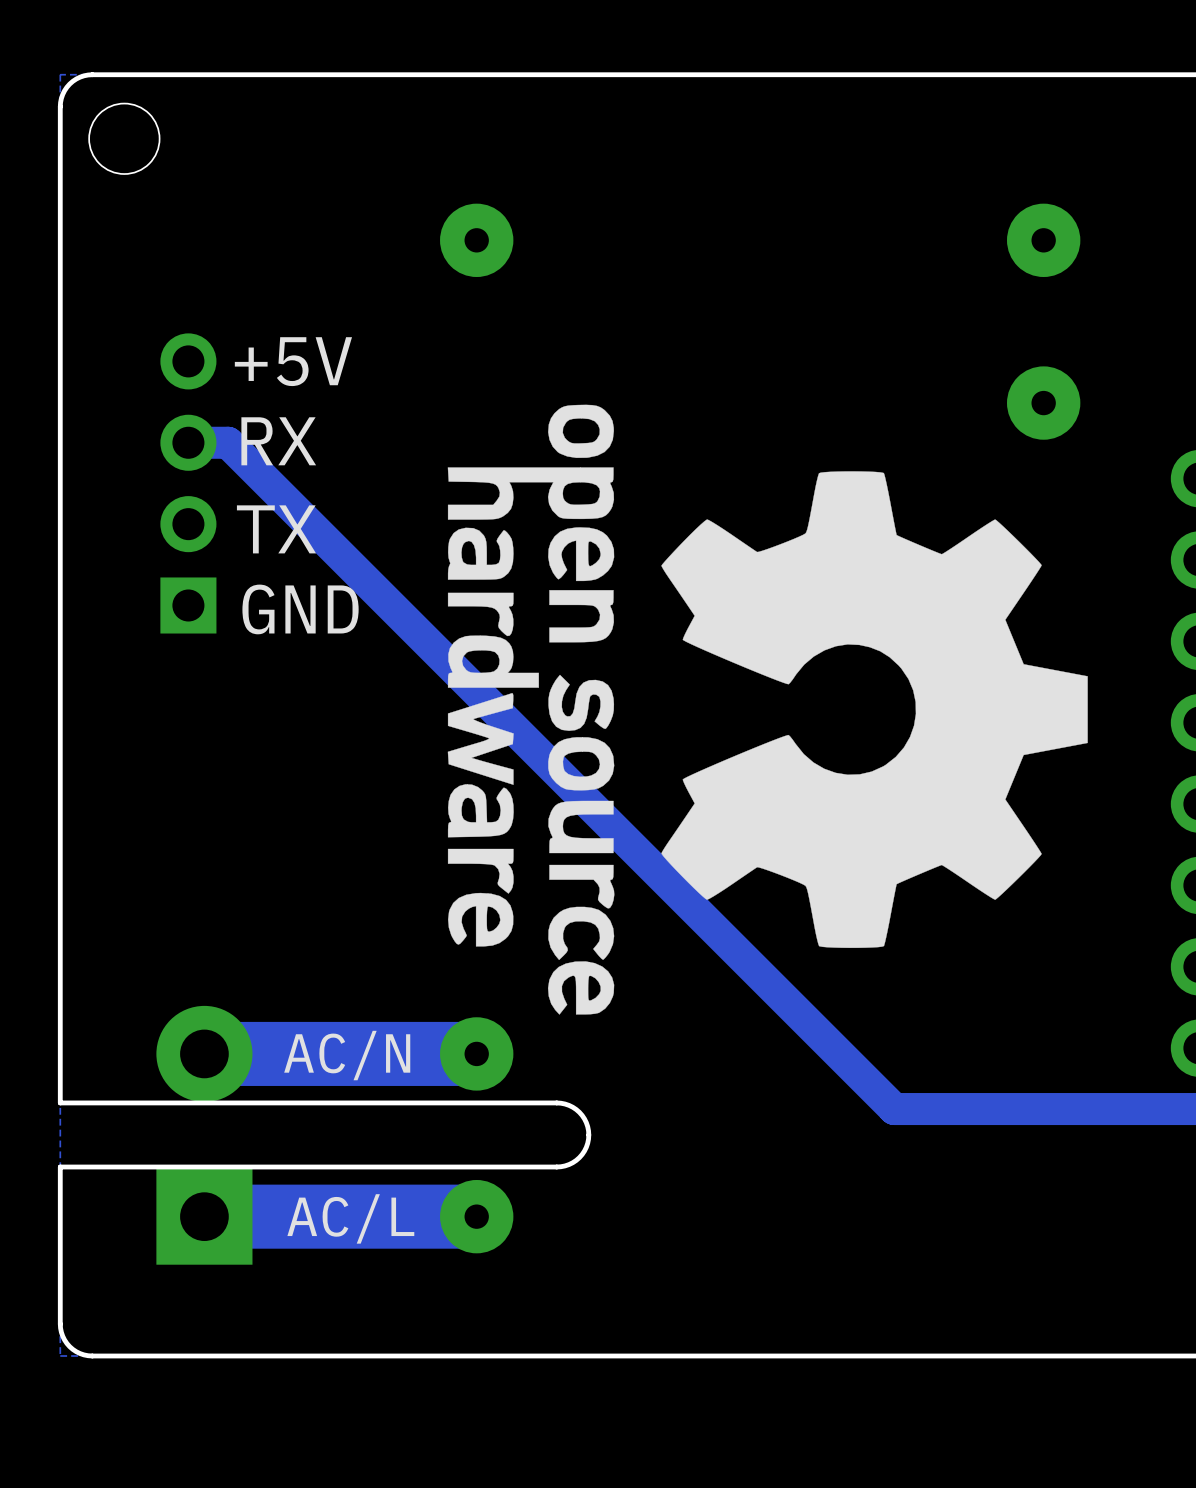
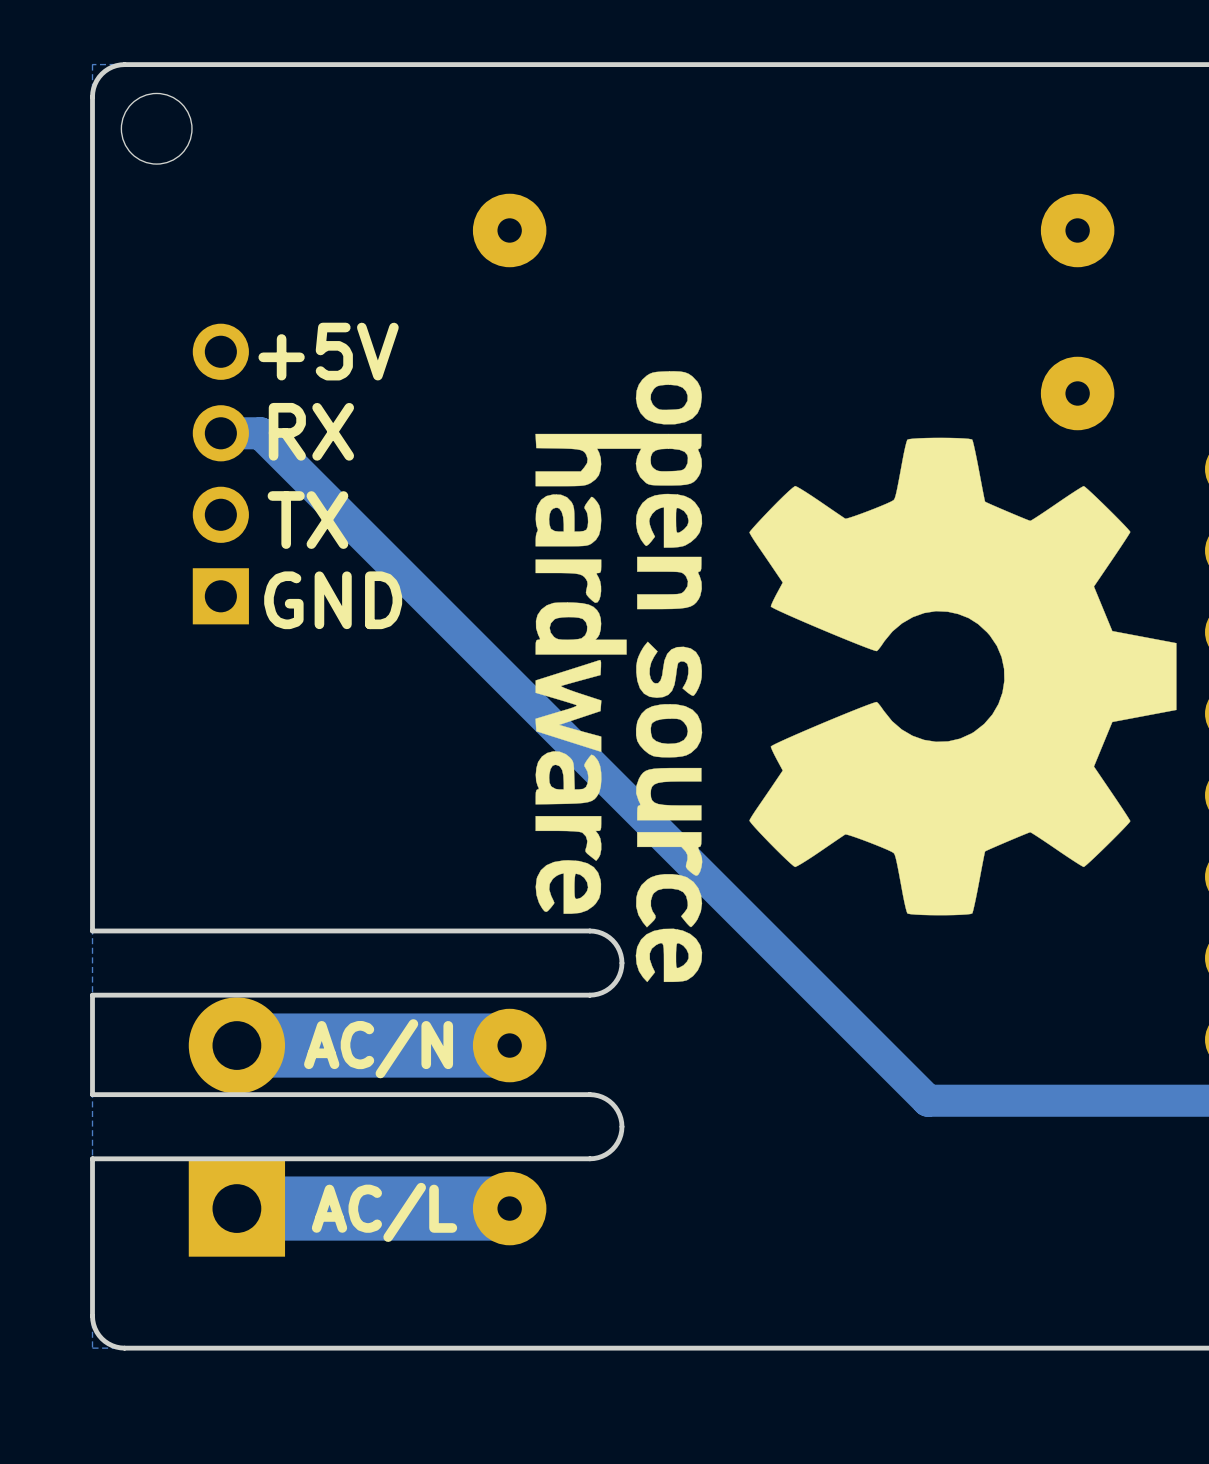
drawing position: (767, 709) -> (855, 676)
board edge: (60, 939) (60, 1003) -> (92, 930) (589, 930) (602, 933) (612, 940) (619, 950) (621, 963) (619, 975) (612, 985) (602, 992) (589, 995) (92, 995)

